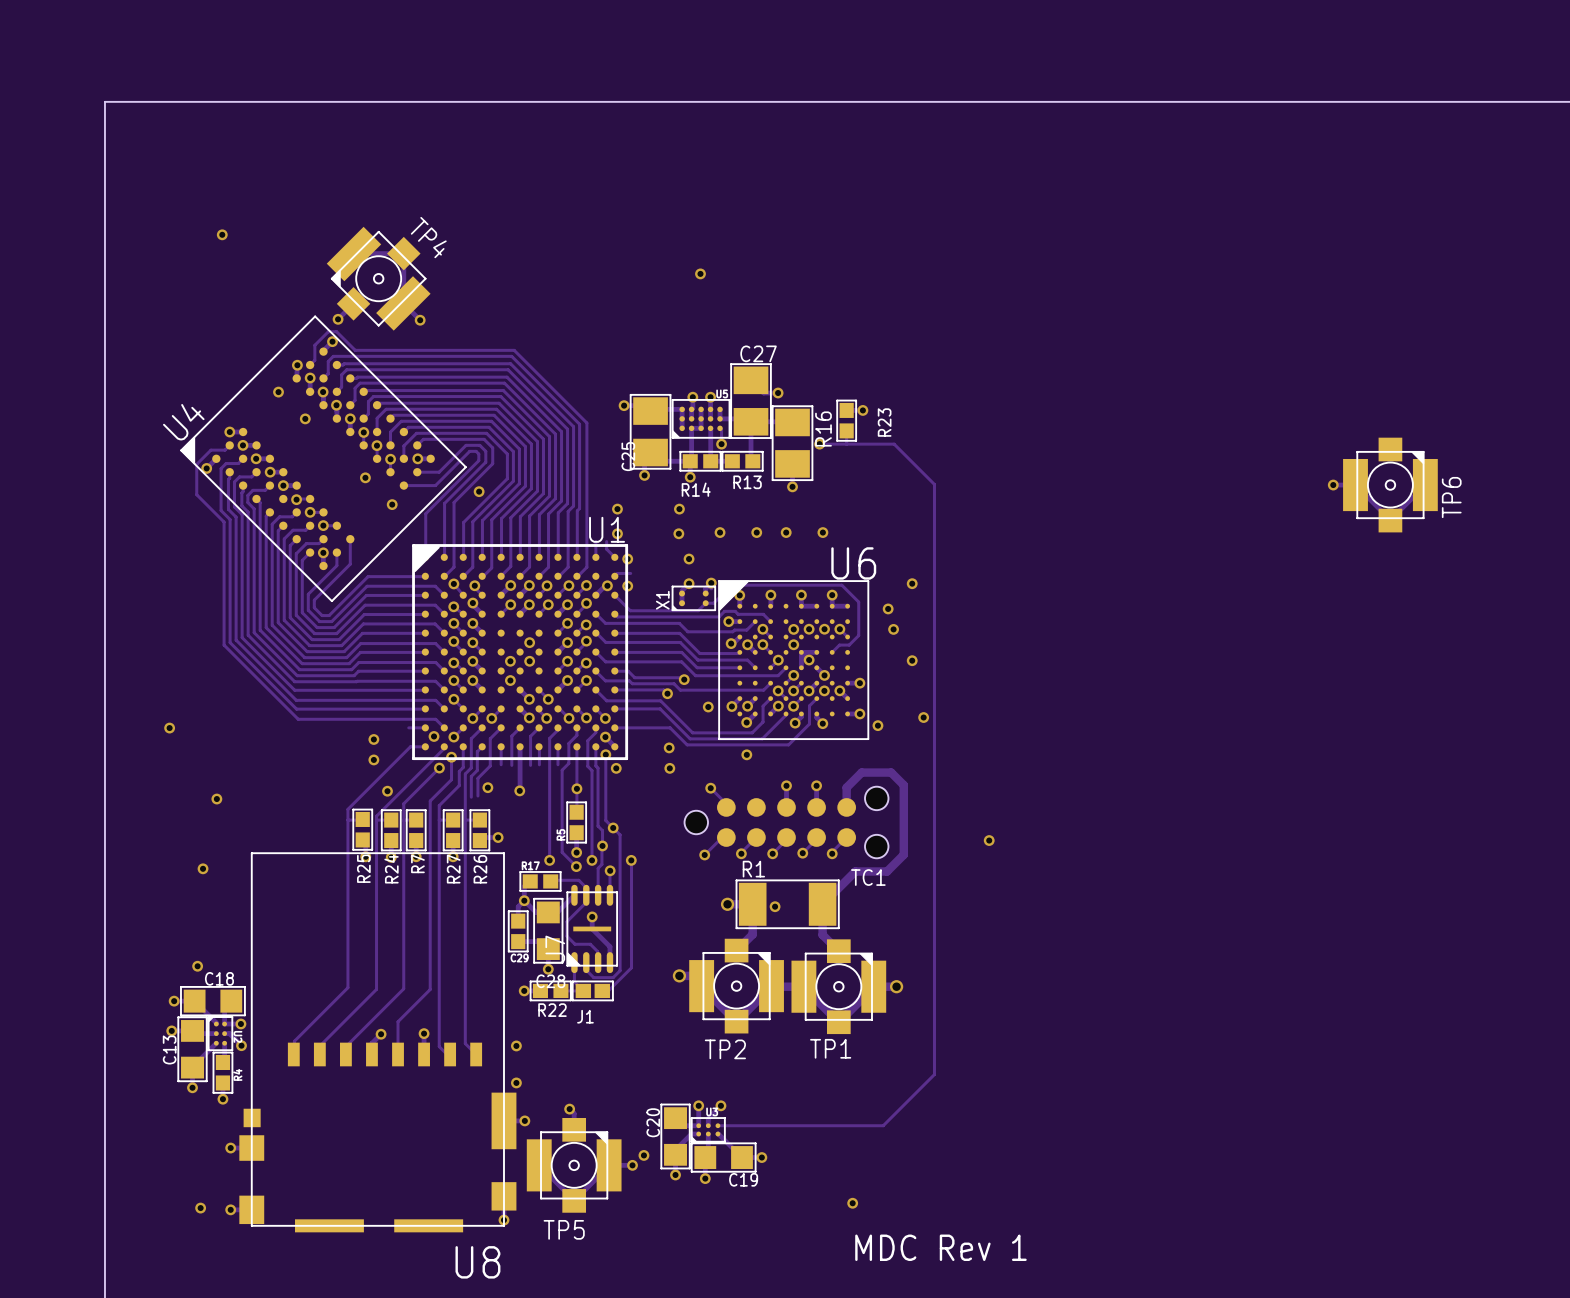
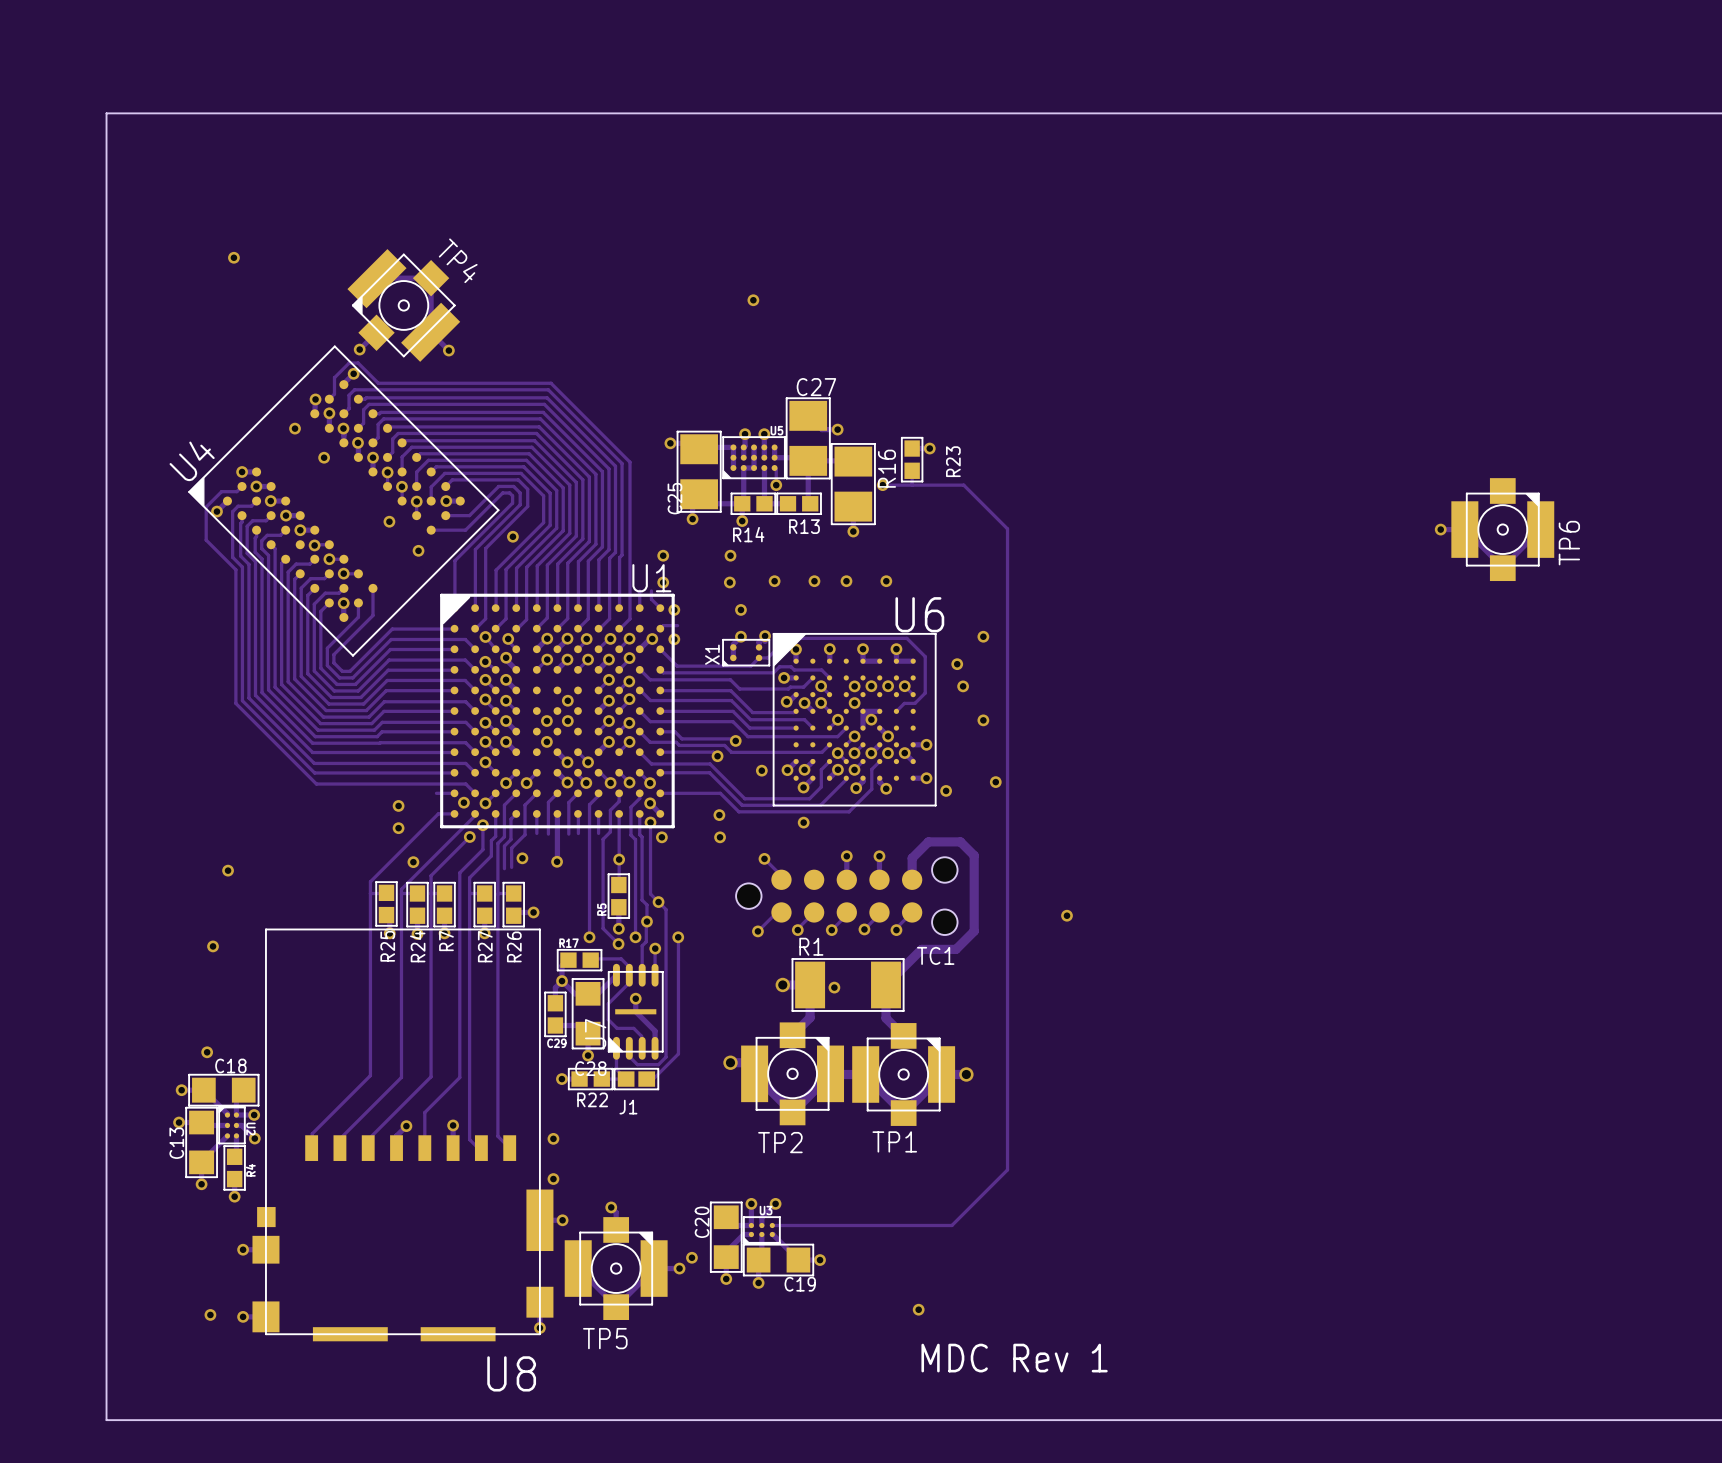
via: (169, 728) -> none

